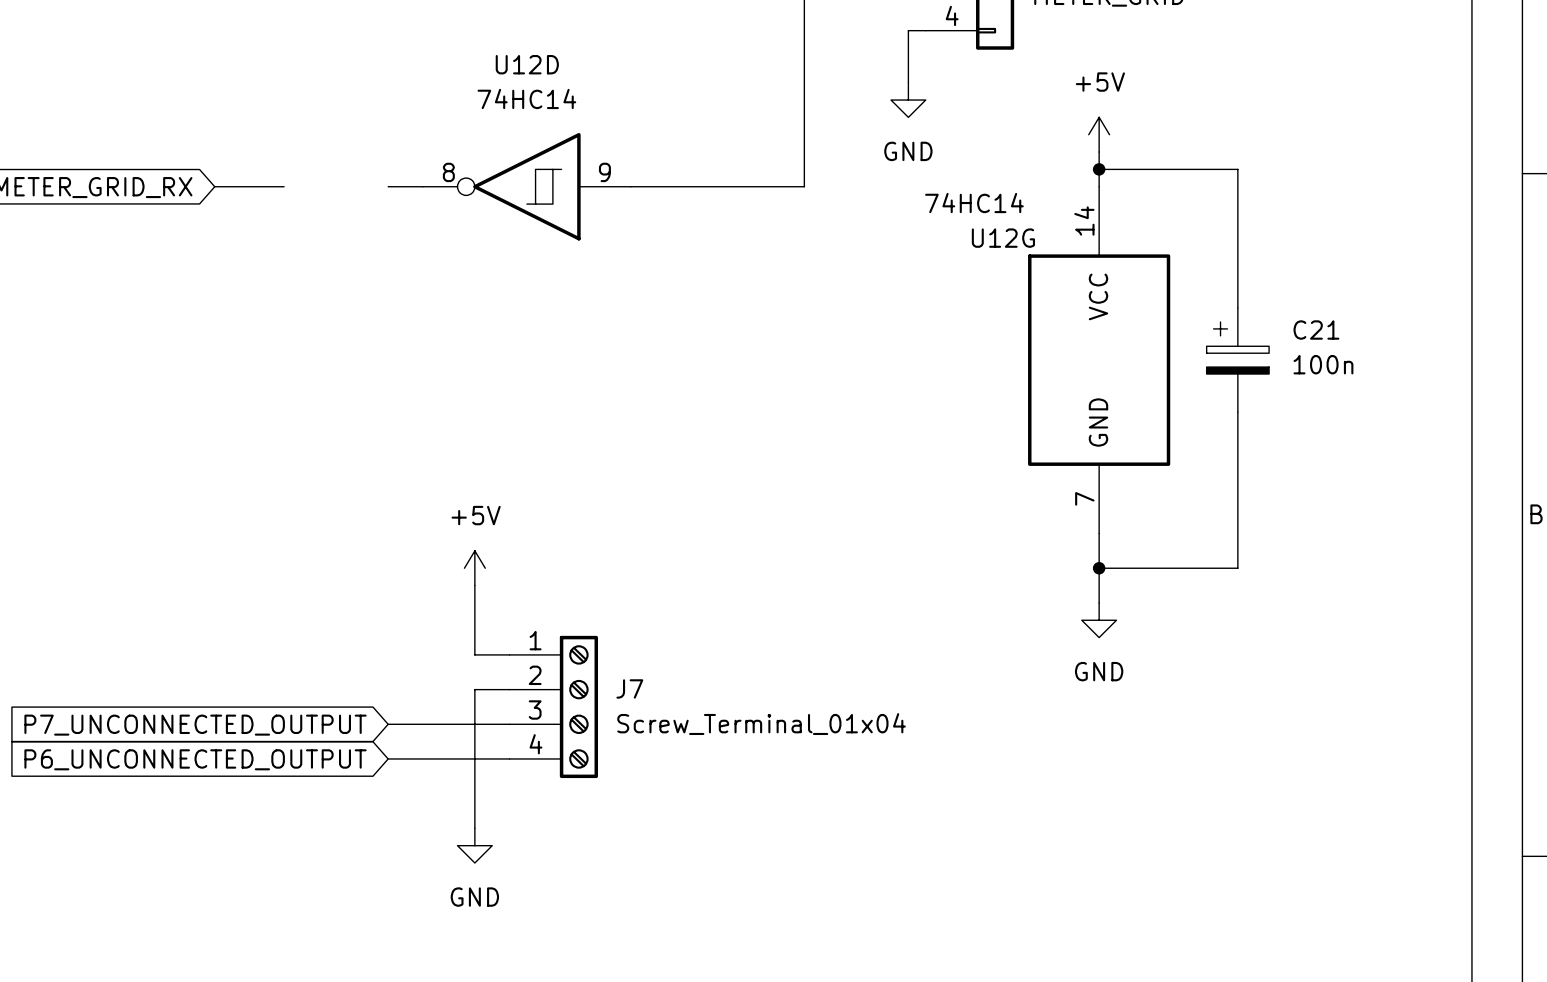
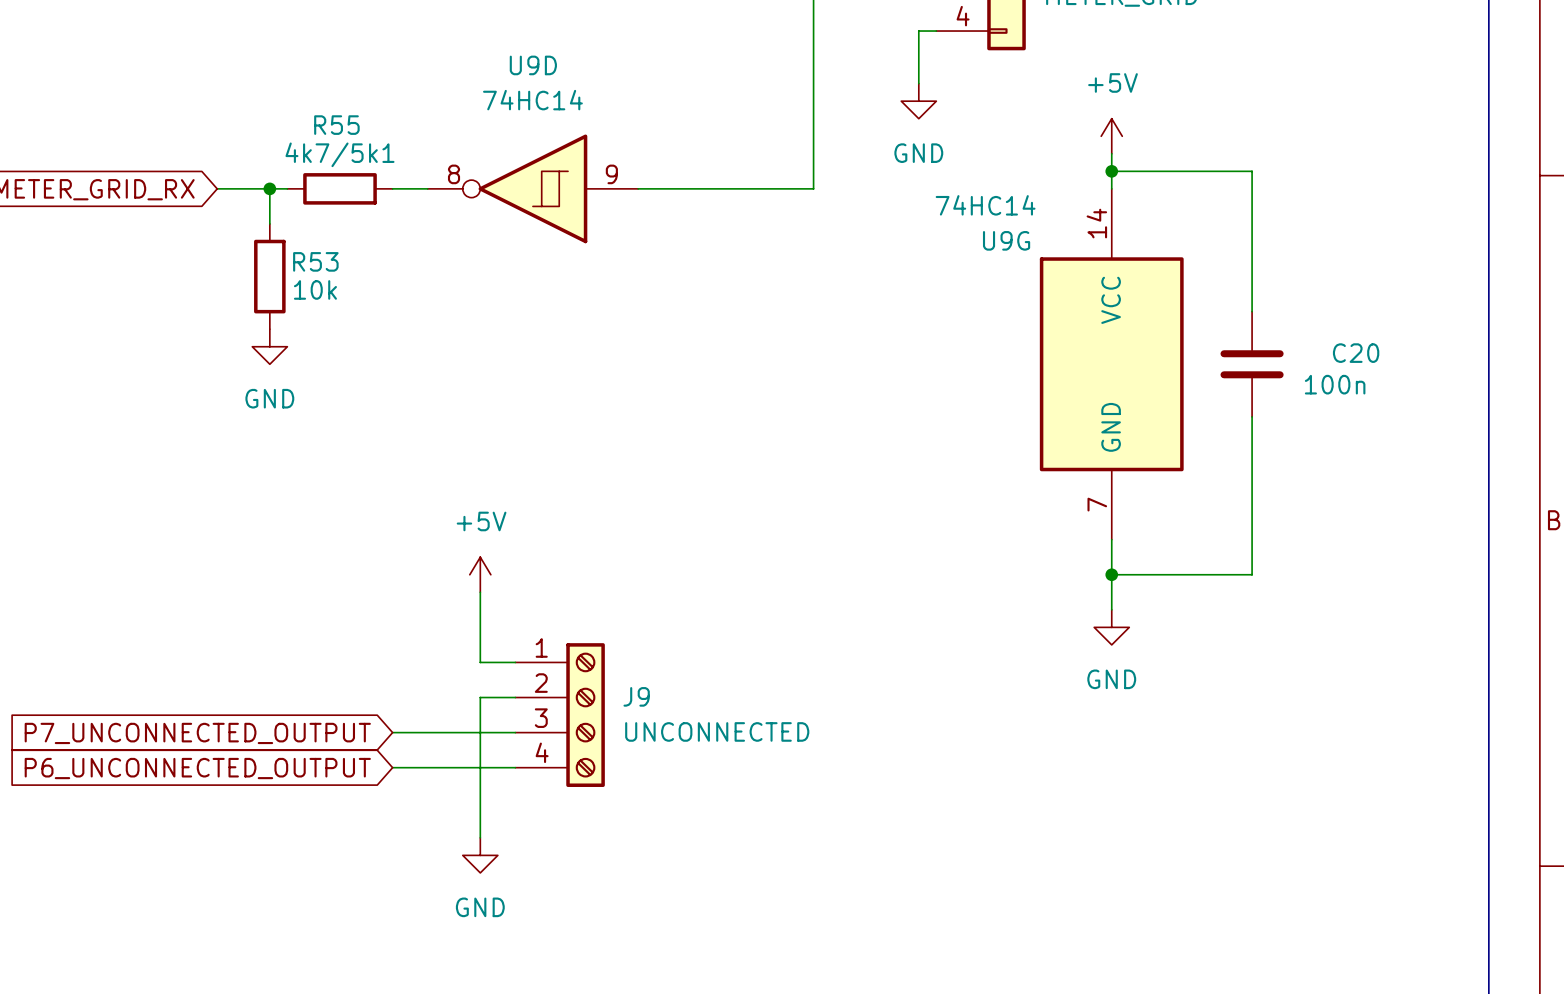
U12D name: U12D (527, 64) -> U9D (533, 65)
wire: none -> (269, 188) (269, 223)
junction: none -> (269, 188)
R55: none -> 4k7/5k1 (340, 188)
U12G name: U12G (1003, 238) -> U9G (1006, 240)
R53: none -> 10k (269, 276)
power symbol: none -> GND (269, 346)
C21: 100n (1237, 360) -> none
C20: none -> 100n (1252, 364)
J7 name: J7 (629, 688) -> J9 (636, 696)
J7 value: Screw_Terminal_01x04 (761, 724) -> UNCONNECTED (717, 731)

